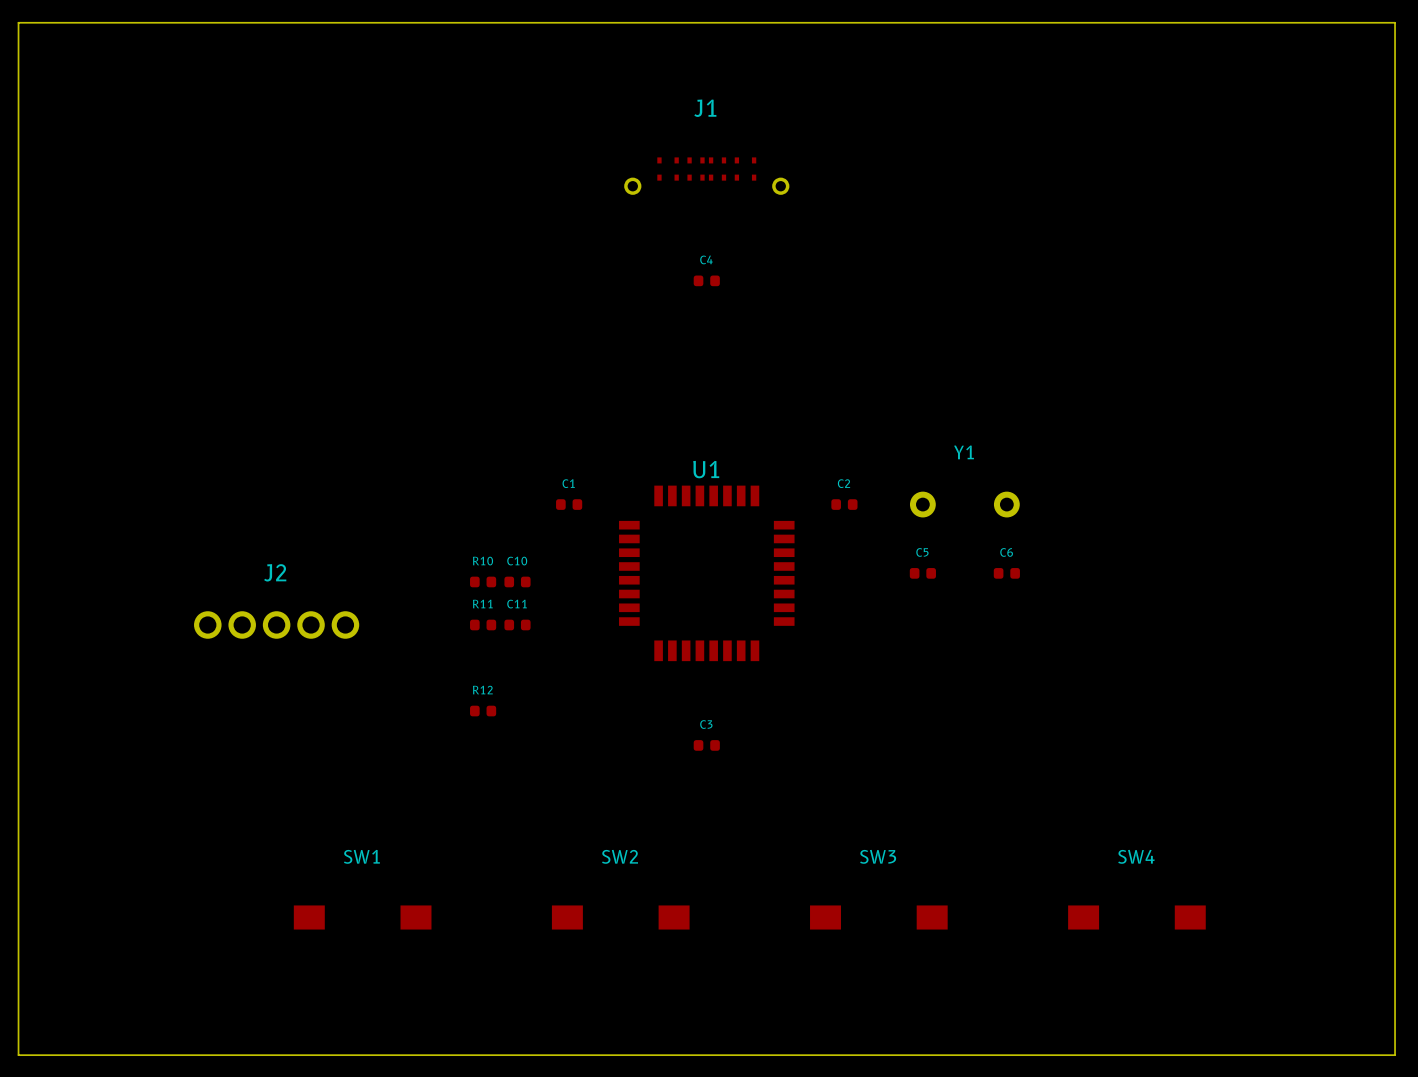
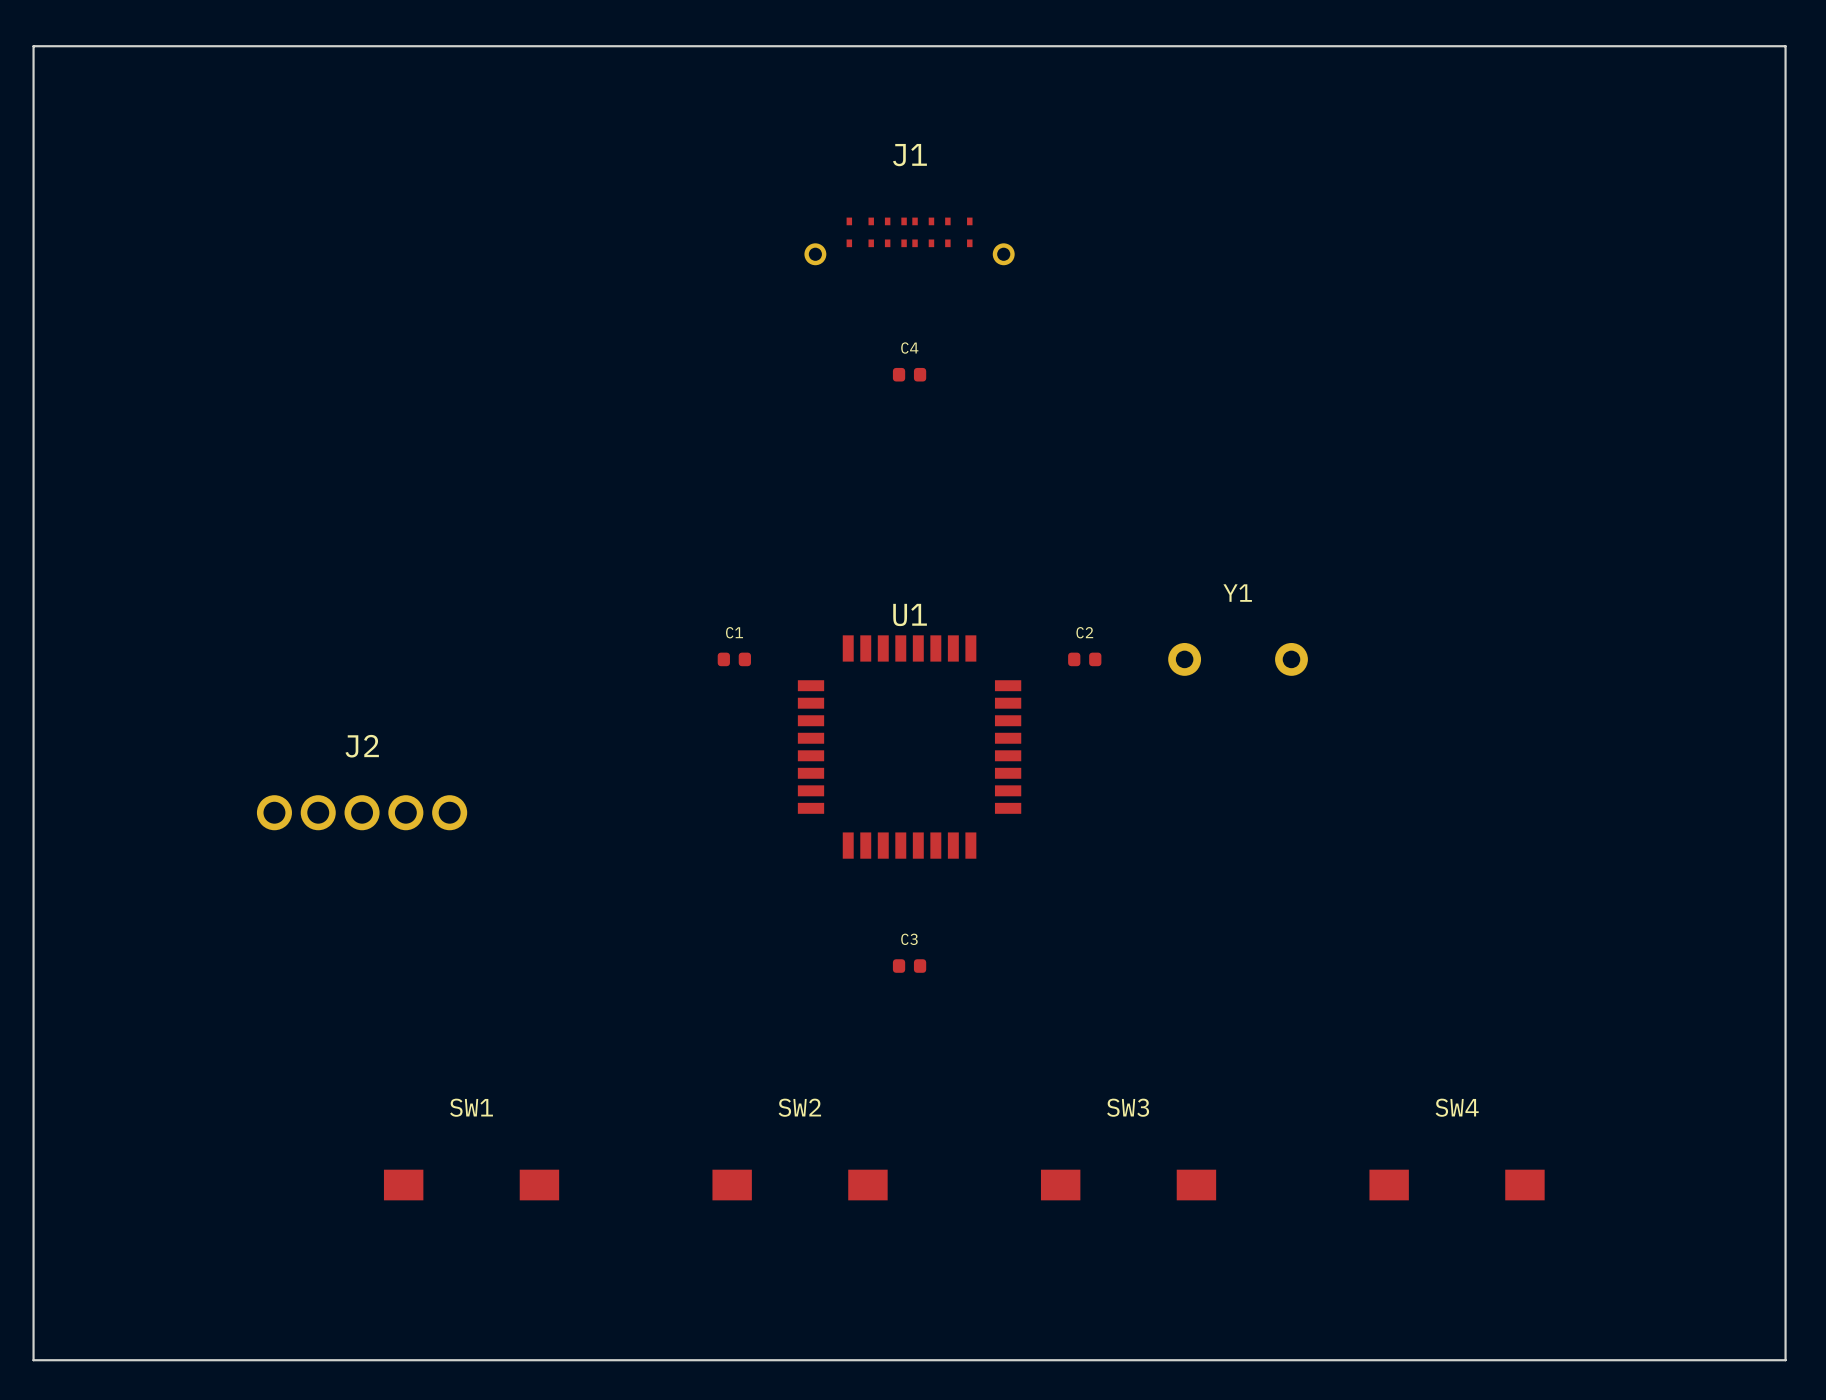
C5: (922, 573) -> none
C6: (1006, 573) -> none
R10: (483, 581) -> none
C10: (517, 581) -> none
R11: (483, 624) -> none
C11: (517, 624) -> none
R12: (483, 711) -> none

